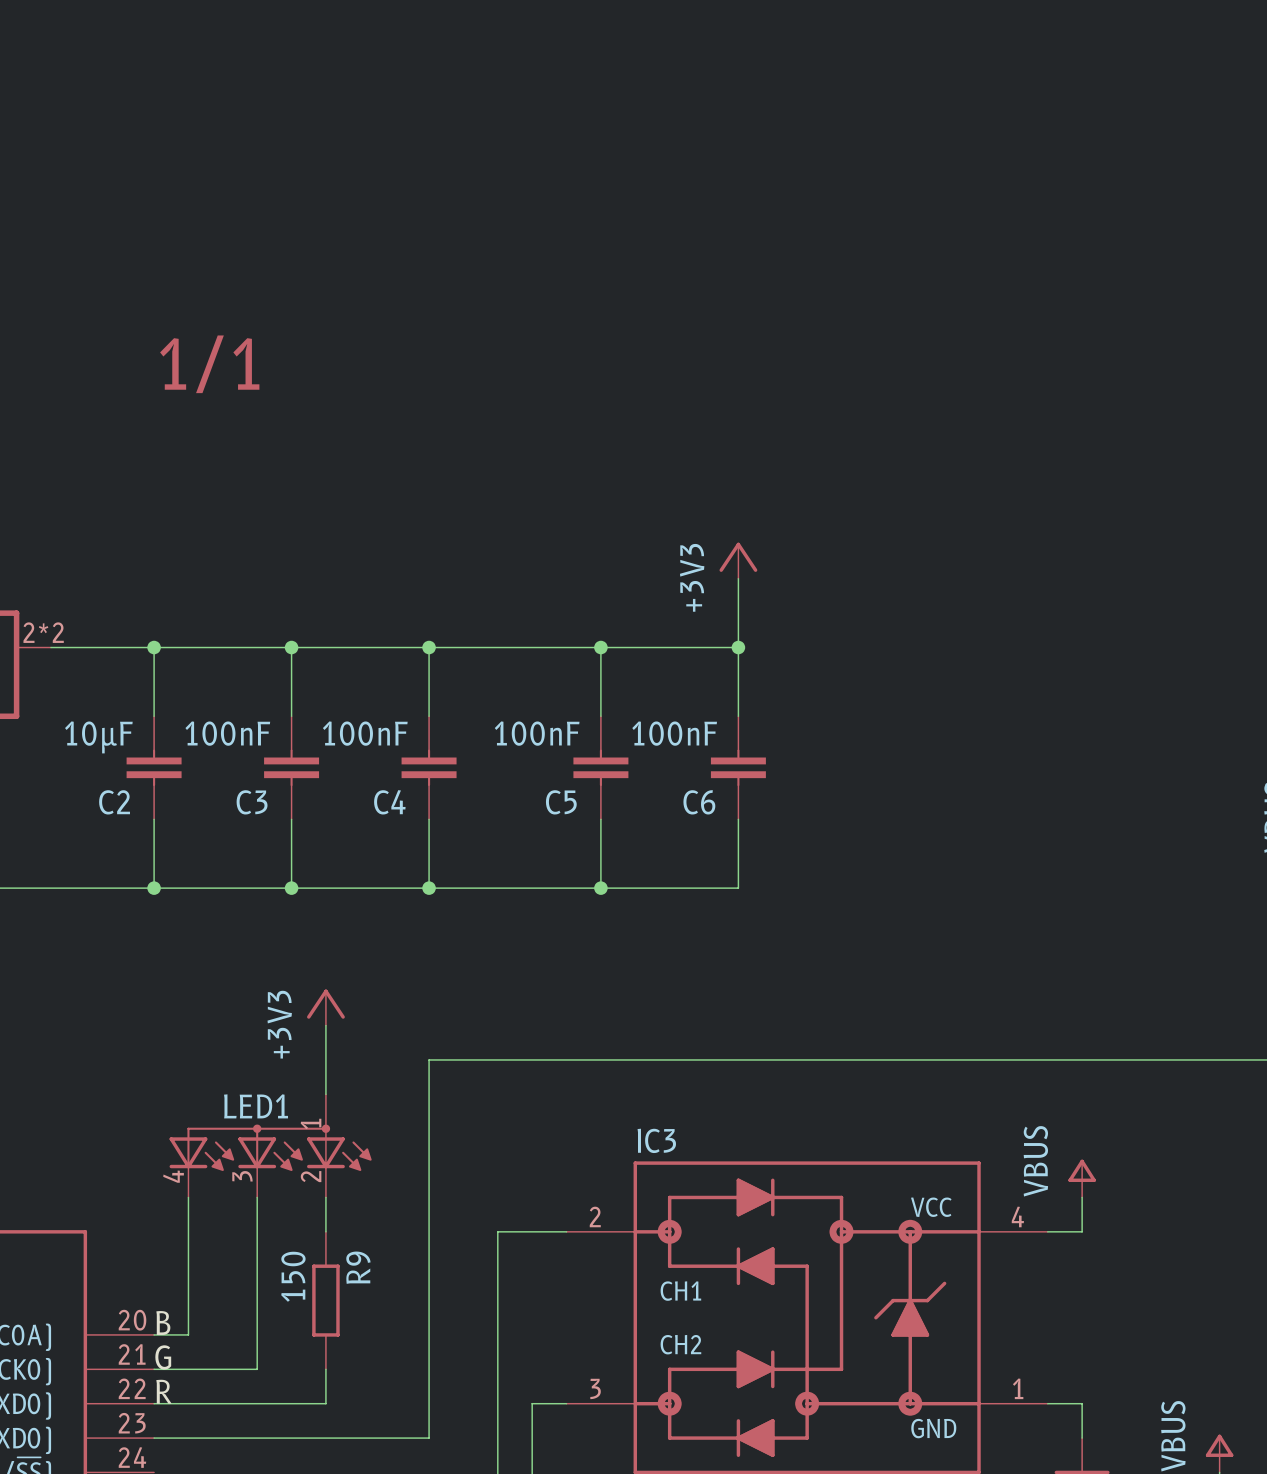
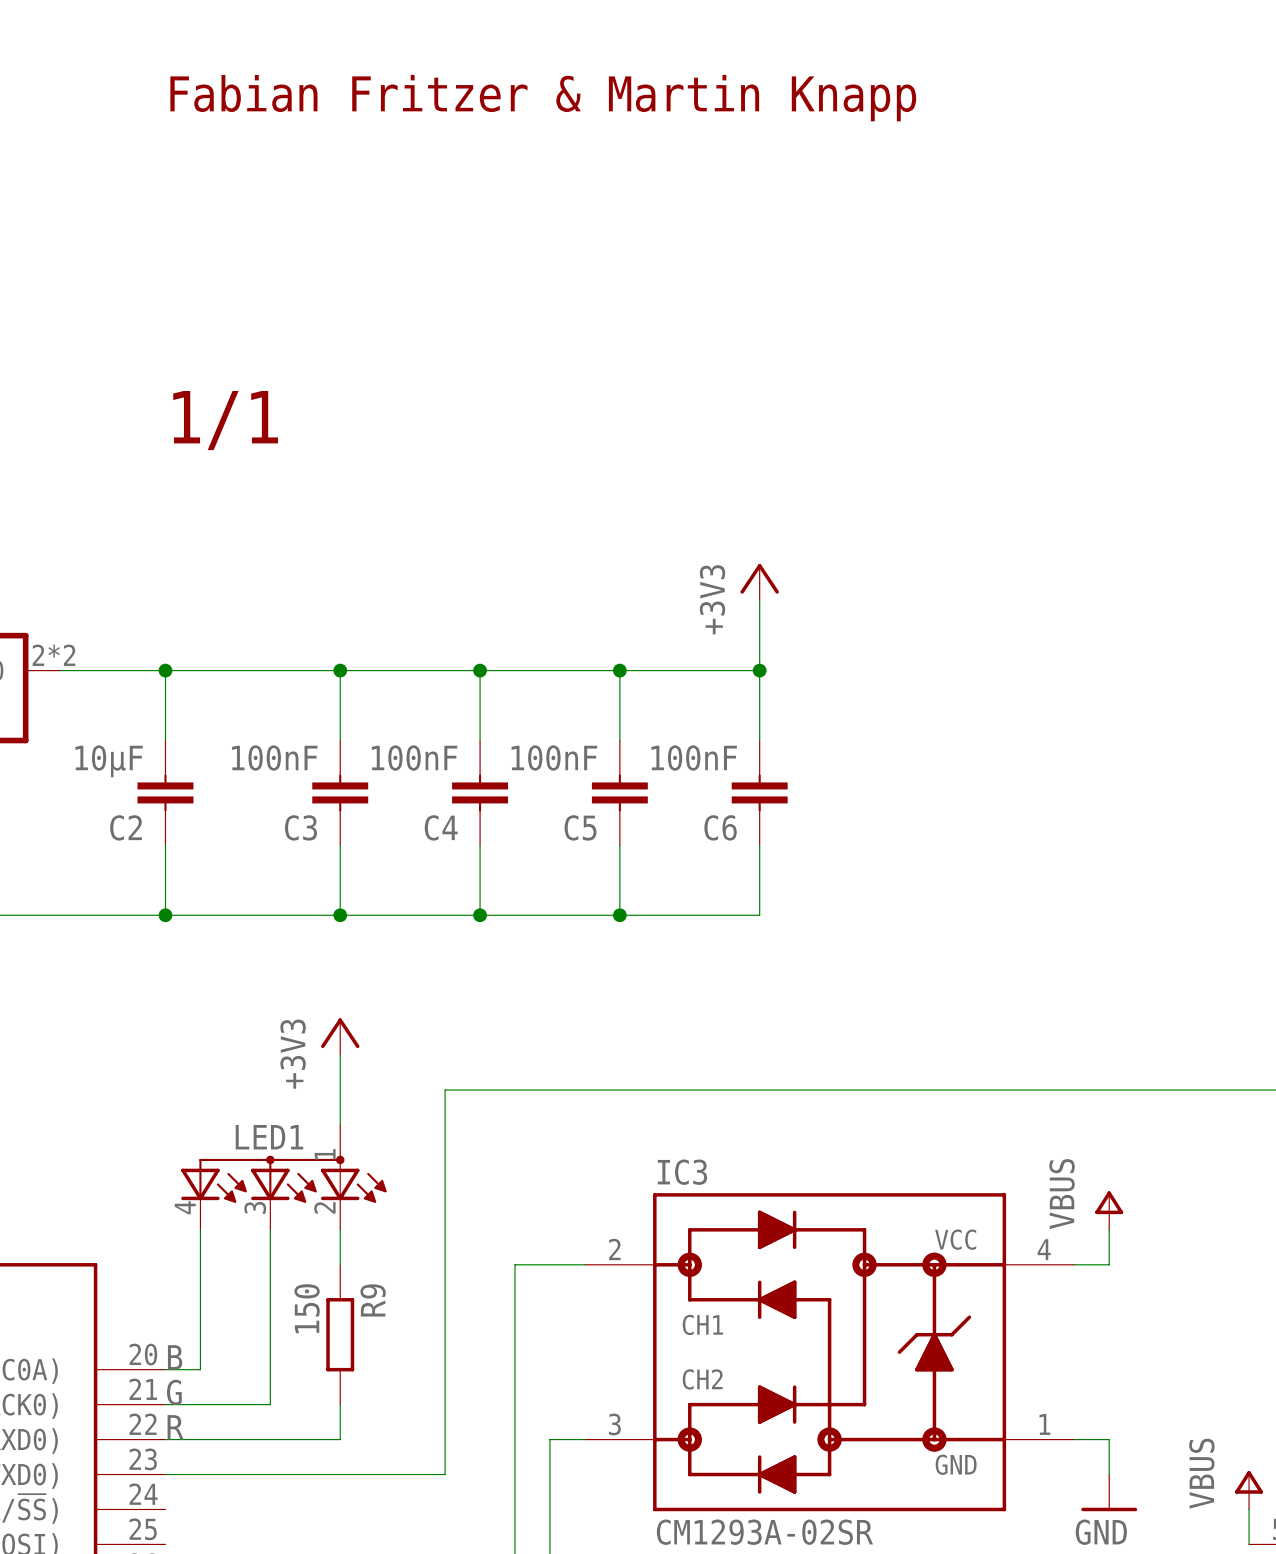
text: none -> Fabian Fritzer & Martin Knapp (543, 98)
text position: 1/1 (209, 364) -> 1/1 (225, 420)
wire: (291, 647) (291, 716) -> (340, 670) (340, 740)
junction position: (291, 647) -> (340, 670)
wire: (429, 647) (429, 716) -> (480, 670) (480, 740)
junction position: (429, 647) -> (480, 670)
C3 position: (291, 767) -> (340, 792)
C4 position: (429, 767) -> (480, 792)
wire: (291, 819) (291, 888) -> (340, 845) (340, 915)
wire: (429, 819) (429, 888) -> (480, 845) (480, 915)
junction position: (291, 888) -> (340, 915)
junction position: (429, 888) -> (480, 915)

